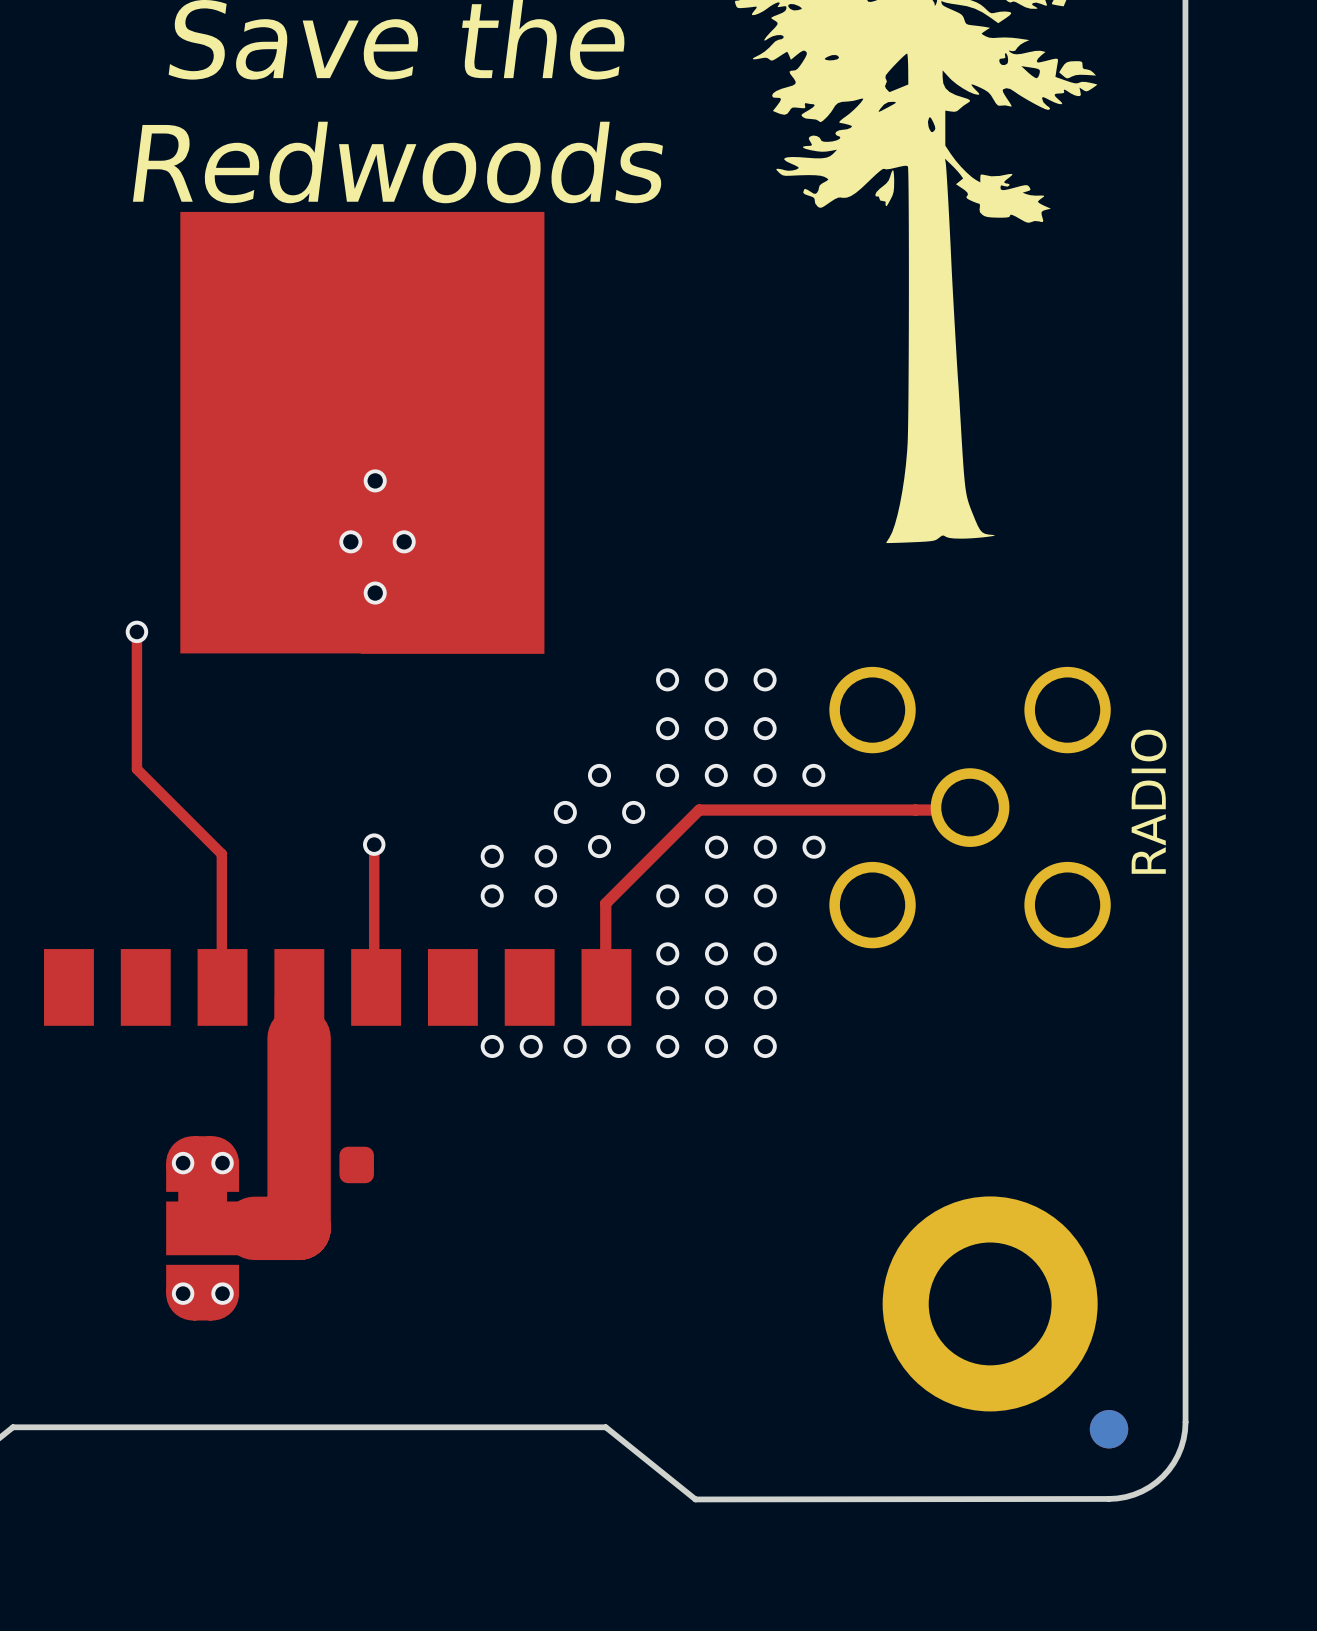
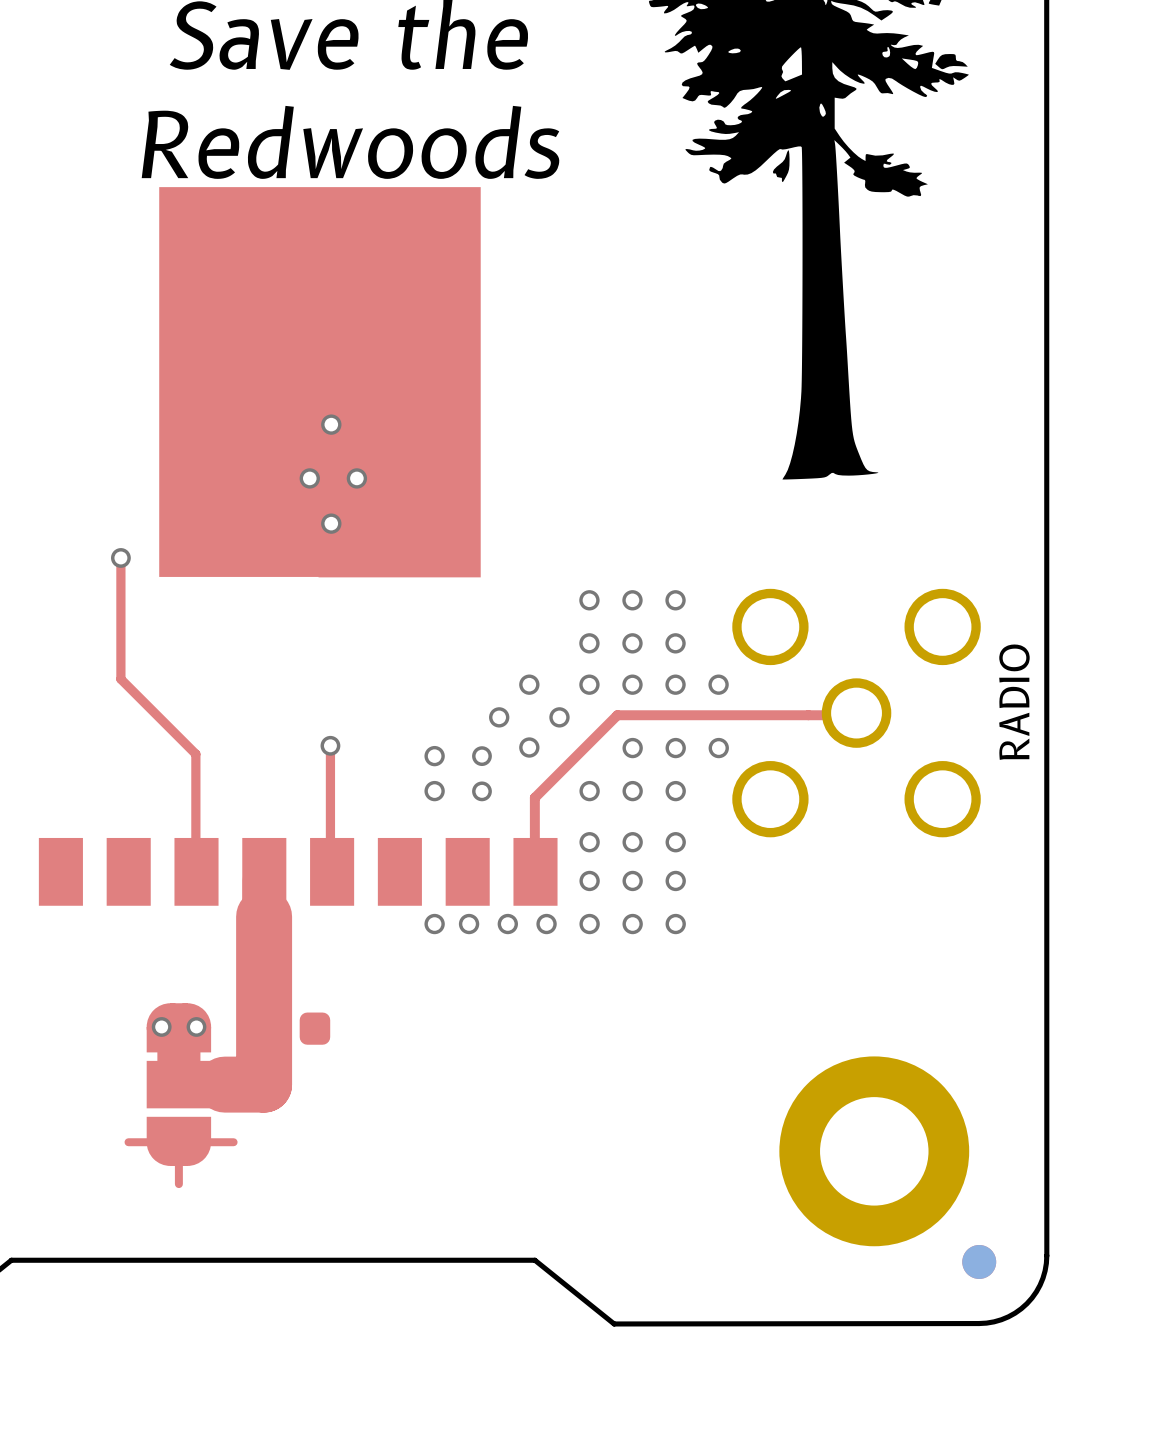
via: (183, 1293) -> none
top track: none -> (178, 1142) (178, 1184)
via: (222, 1293) -> none
top track: none -> (233, 1142) (128, 1142)

